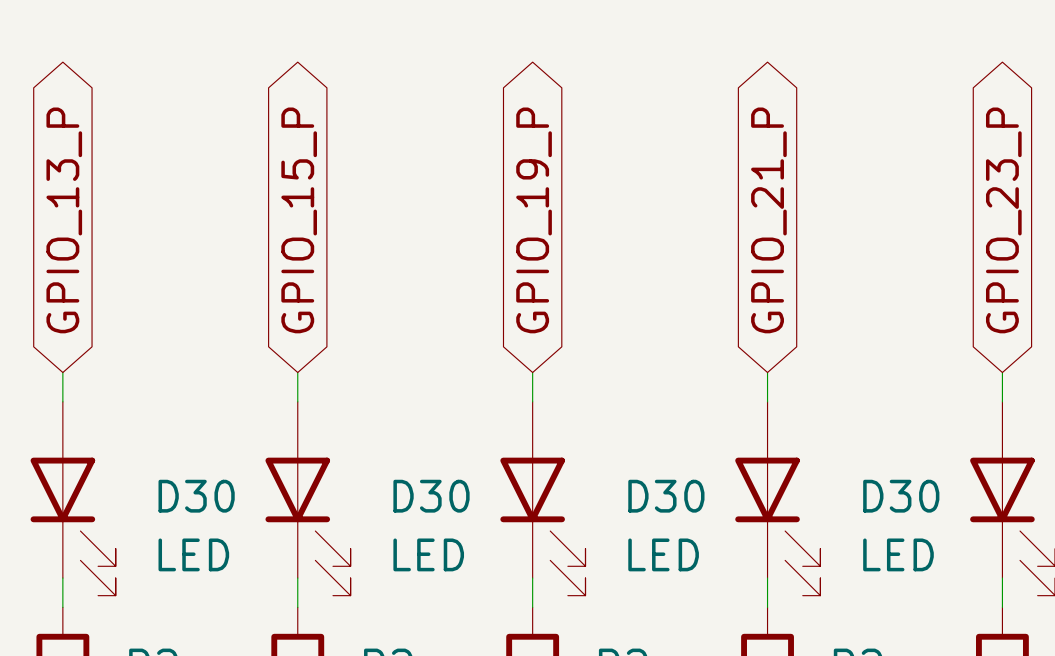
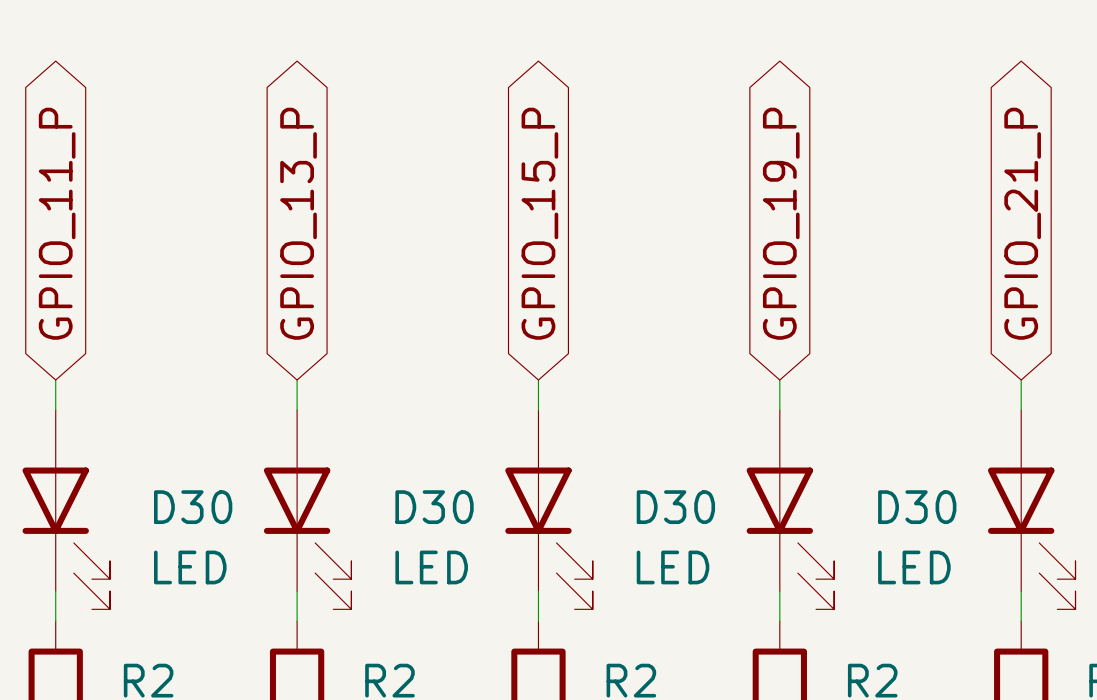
global label: GPIO_13_P (64, 220) -> GPIO_11_P (57, 223)
global label: GPIO_15_P (299, 220) -> GPIO_13_P (298, 223)
global label: GPIO_19_P (534, 220) -> GPIO_15_P (539, 223)
global label: GPIO_21_P (768, 220) -> GPIO_19_P (781, 223)
global label: GPIO_23_P (1003, 220) -> GPIO_21_P (1022, 223)

